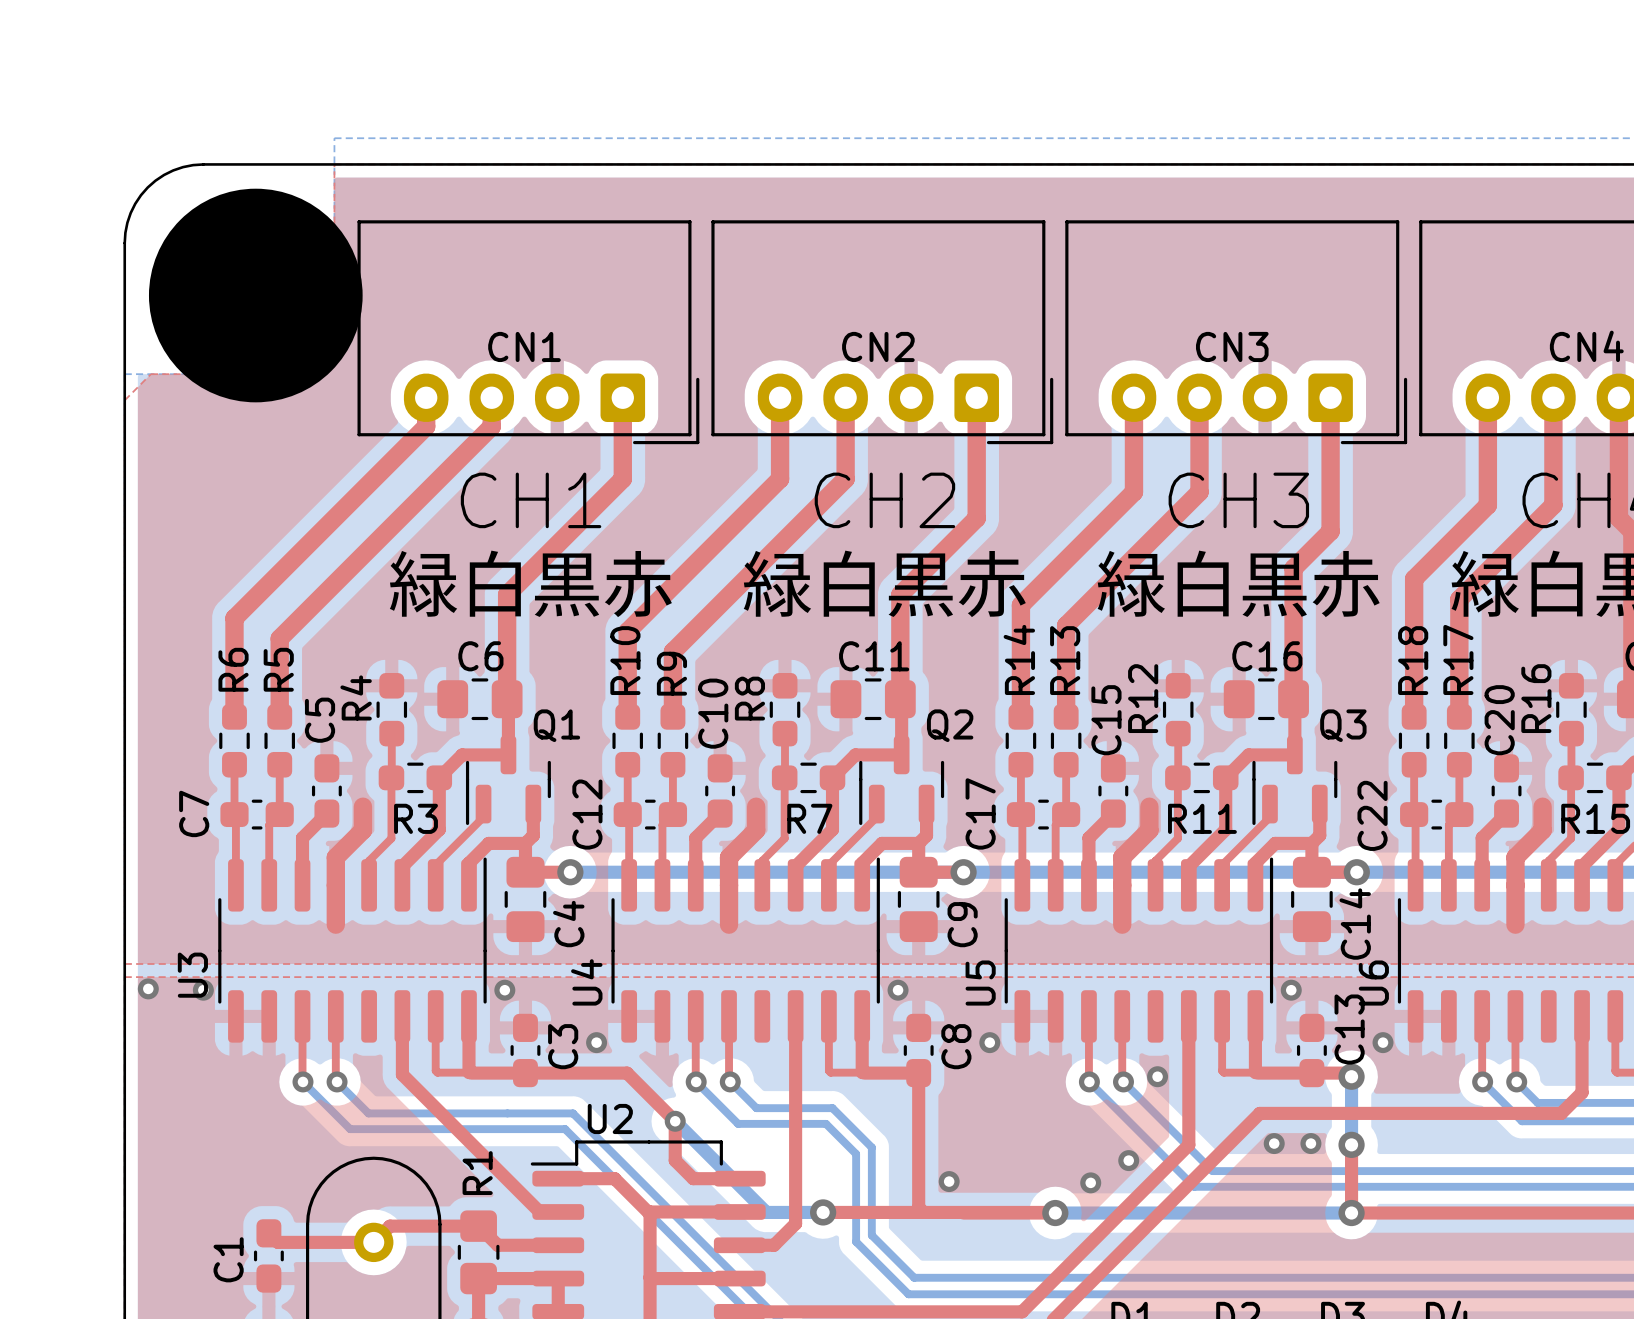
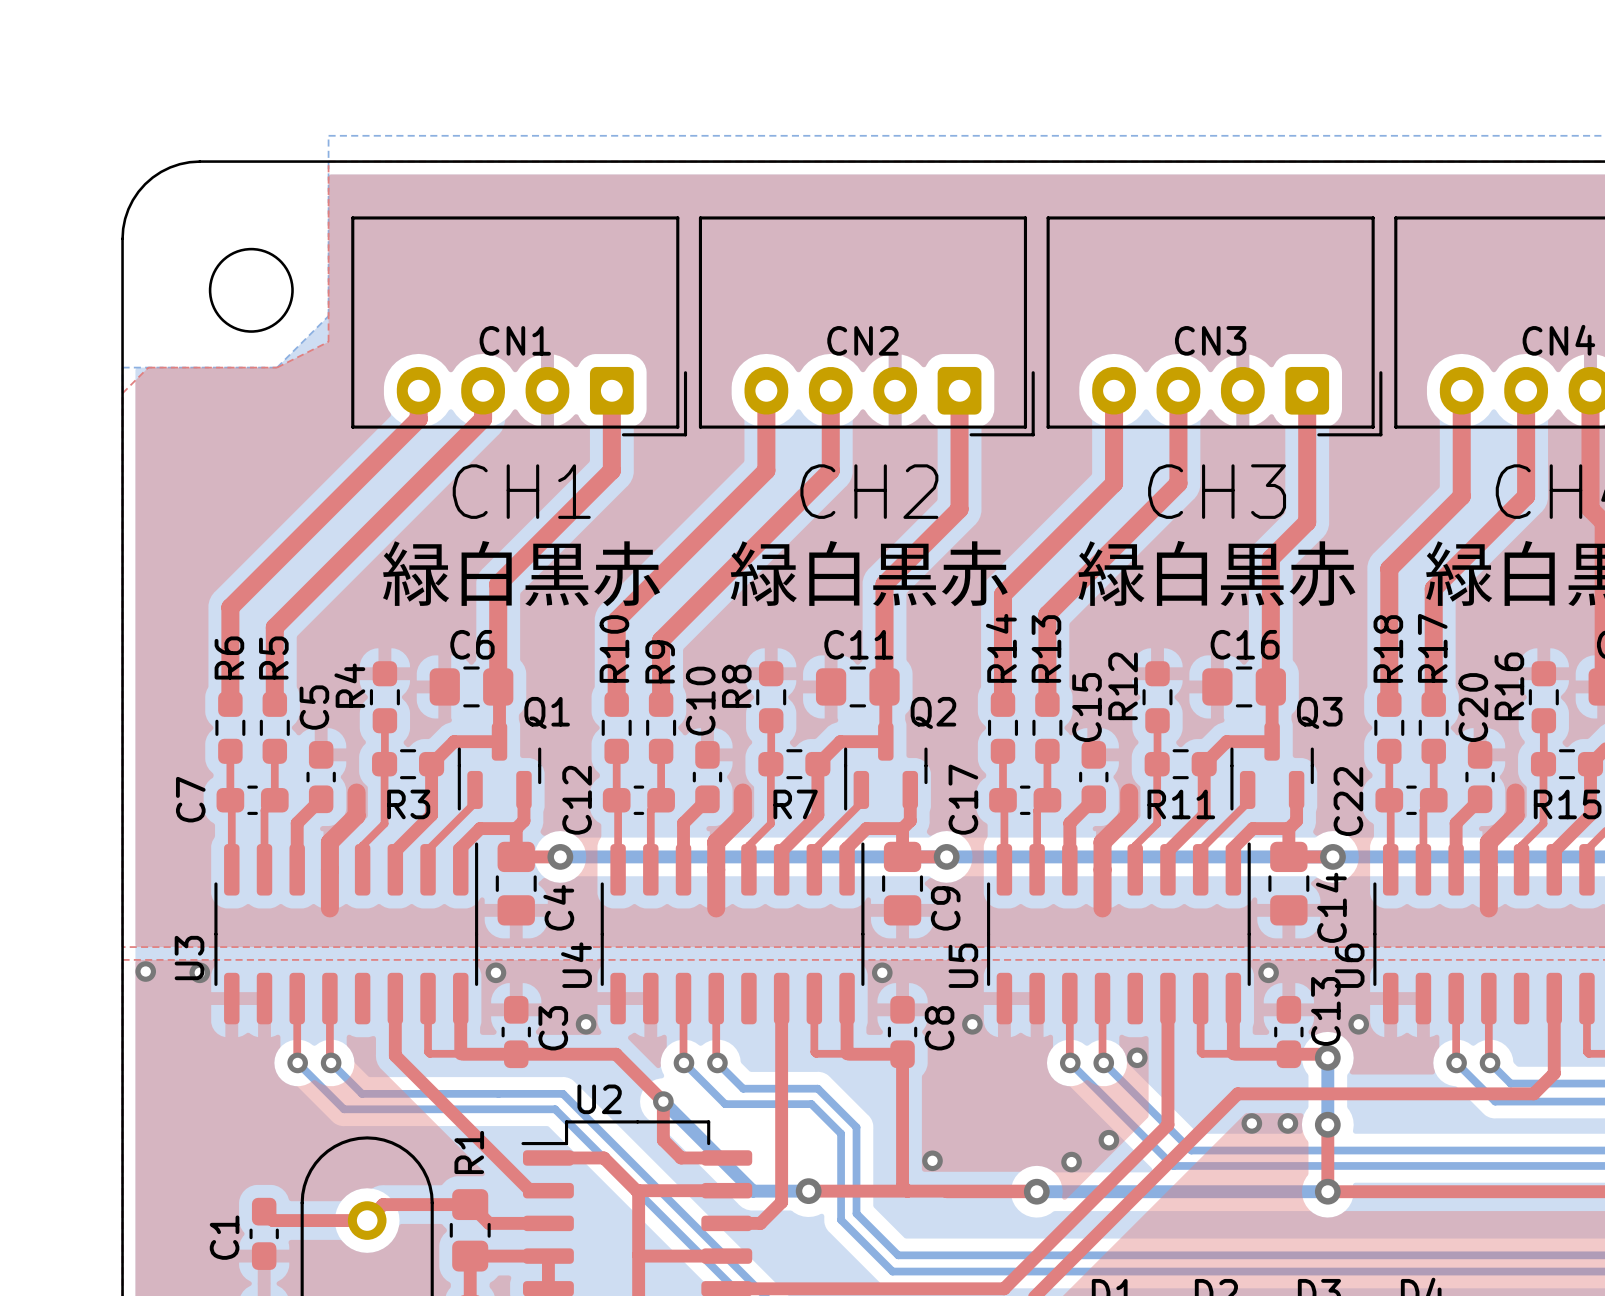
drawing: [148, 188, 363, 403] -> none

